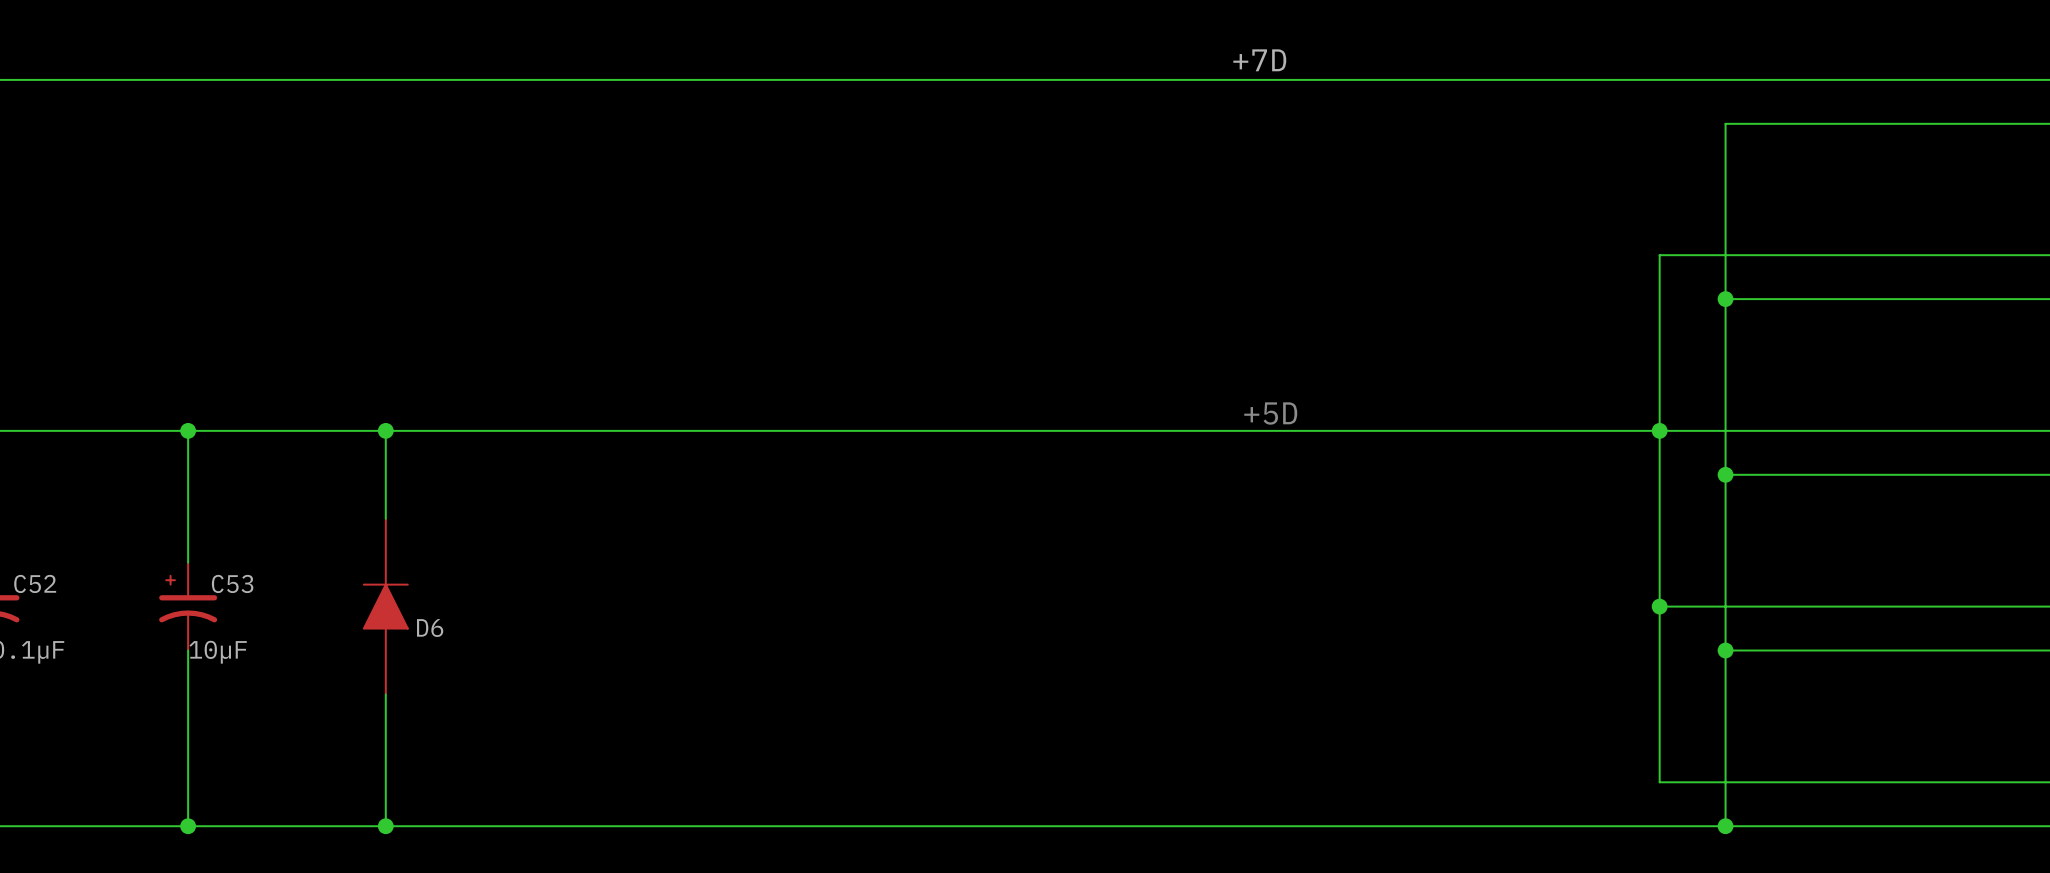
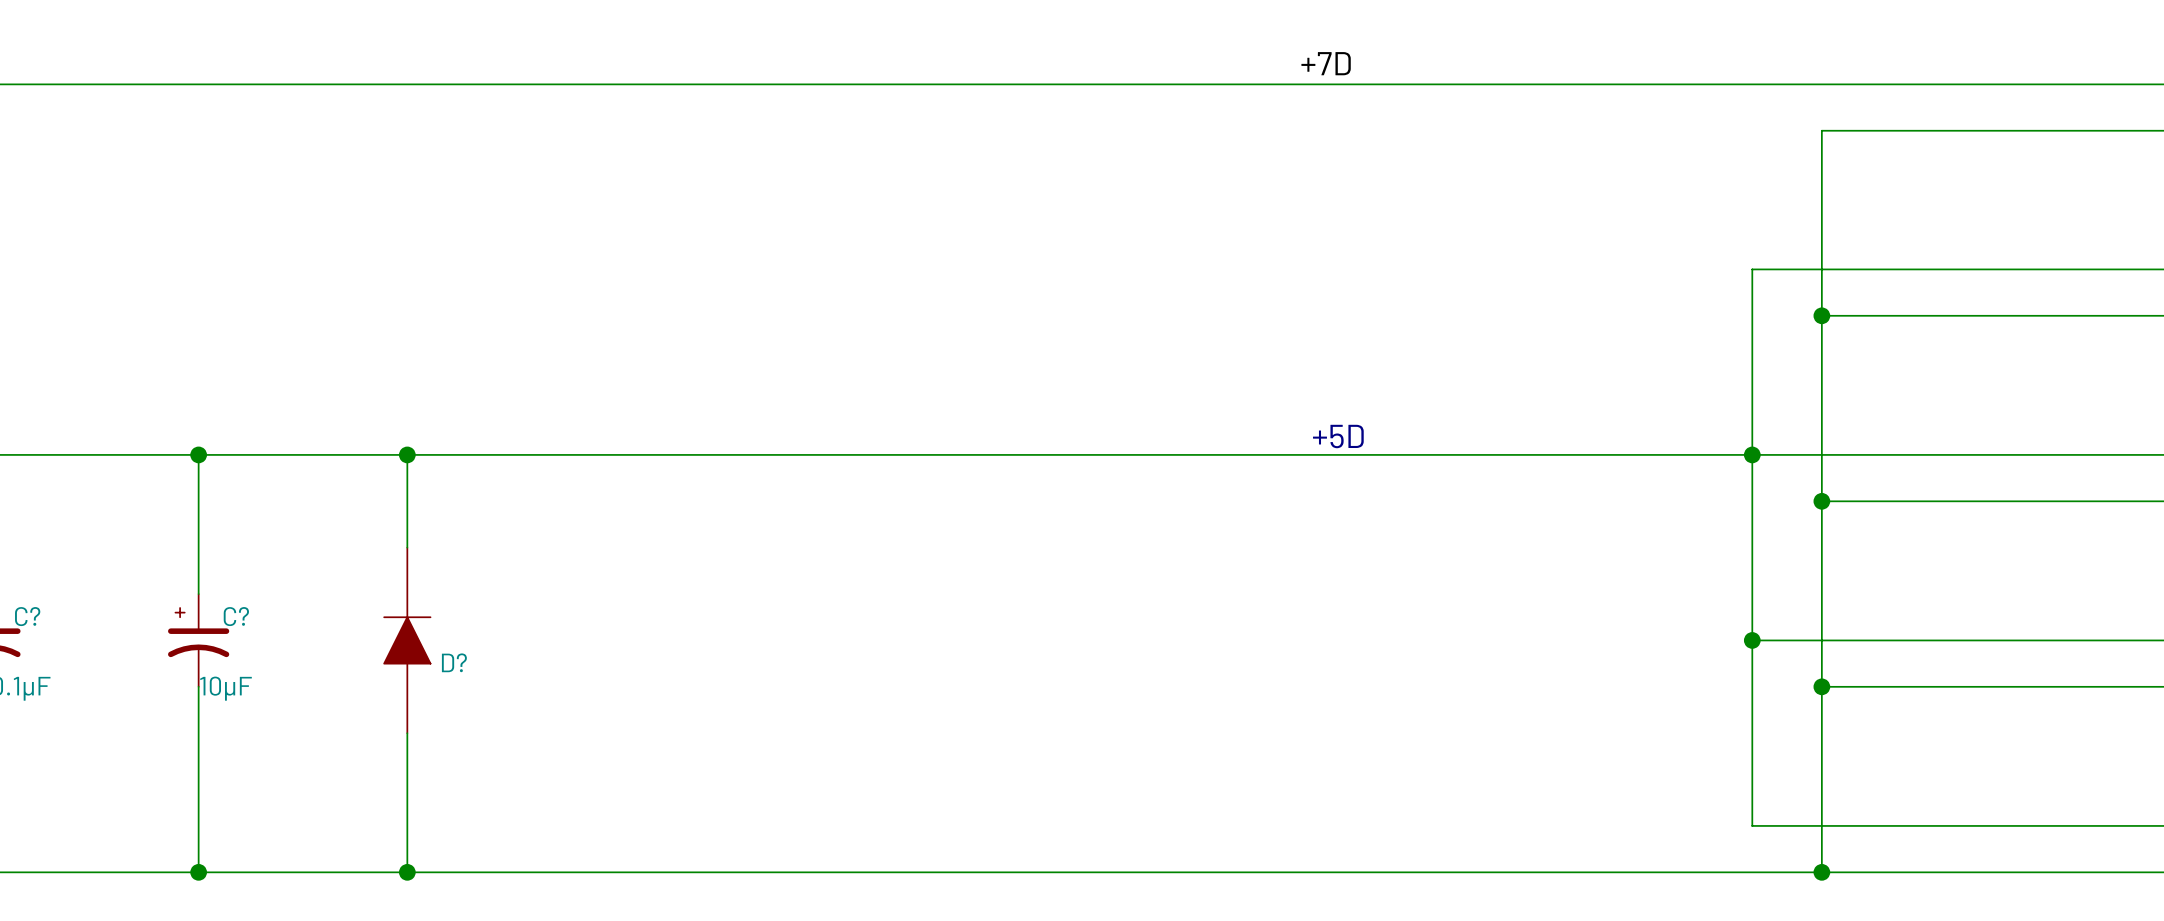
C52 name: C52 (35, 583) -> C? (27, 616)
C53 name: C53 (232, 583) -> C? (236, 616)
D6 name: D6 (430, 628) -> D? (454, 662)

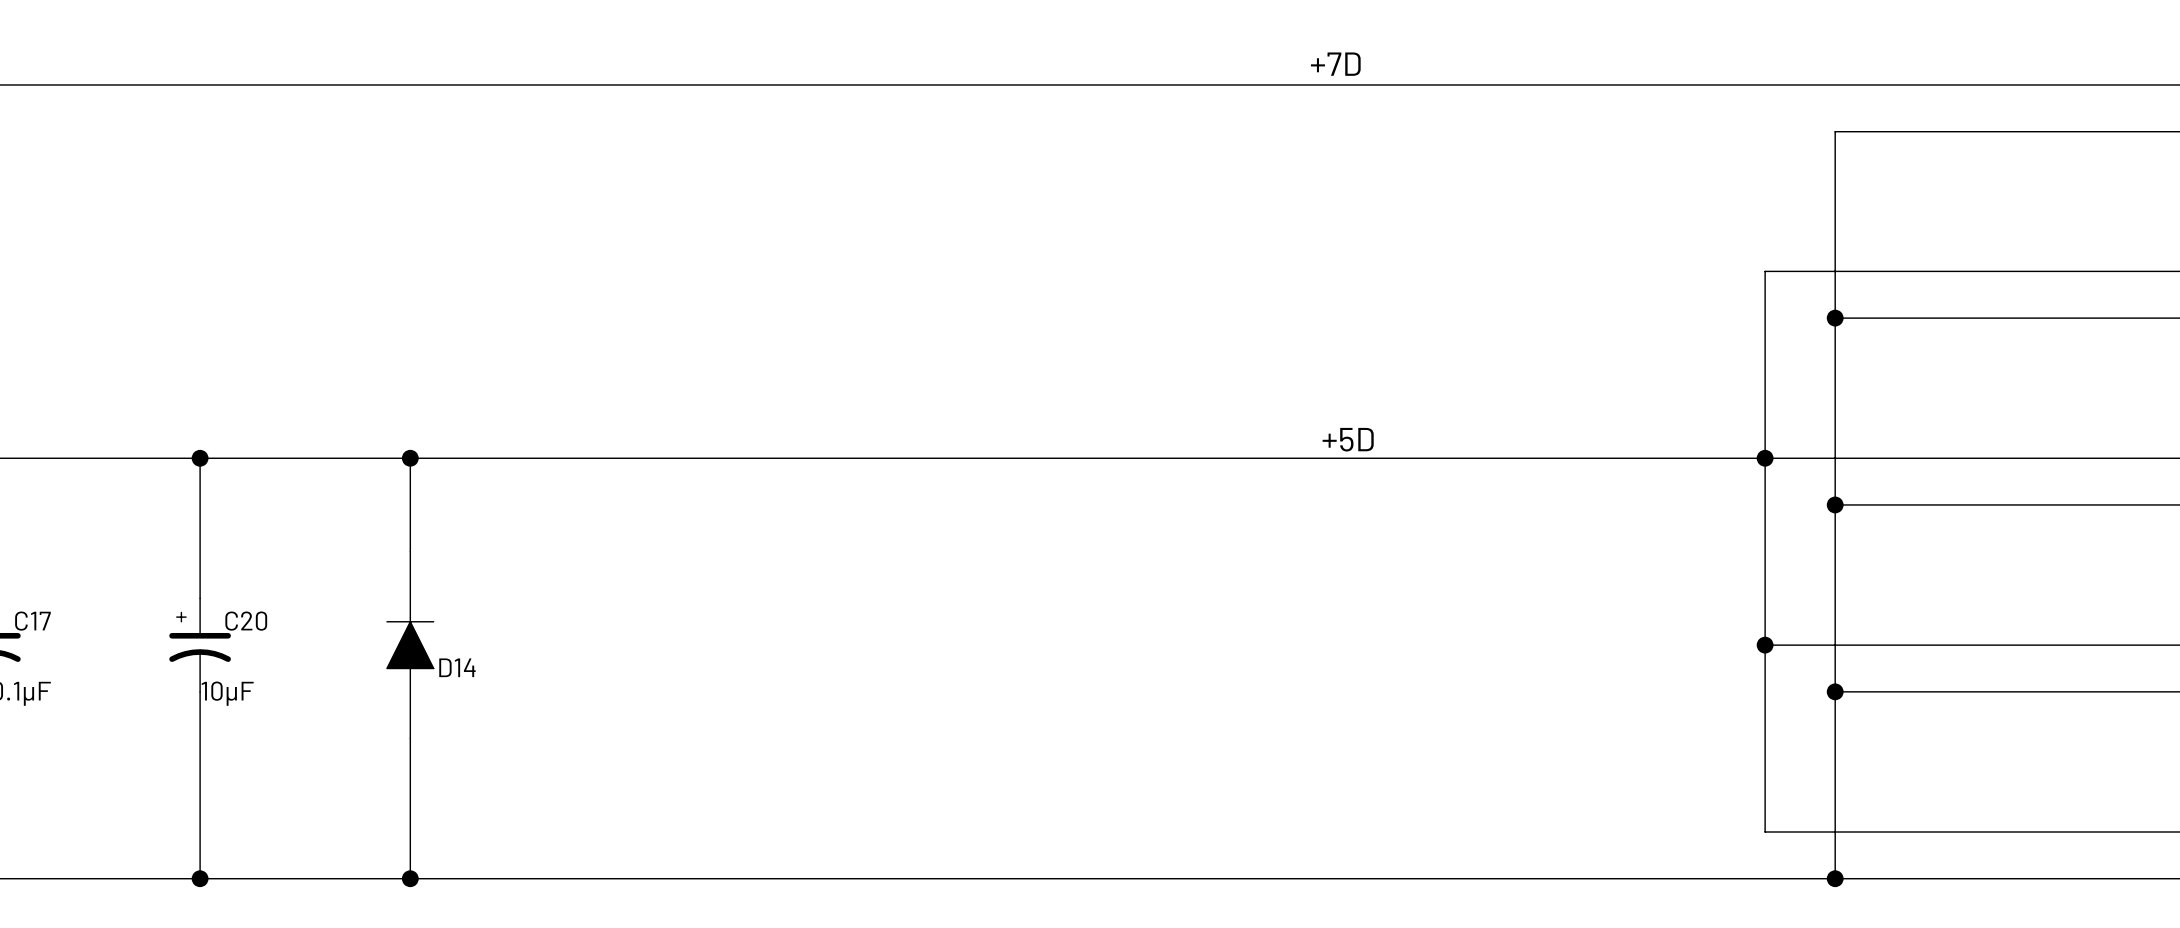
C? name: C? (27, 616) -> C17 (32, 621)
C? name: C? (236, 616) -> C20 (246, 621)
D? name: D? (454, 662) -> D14 (457, 667)

